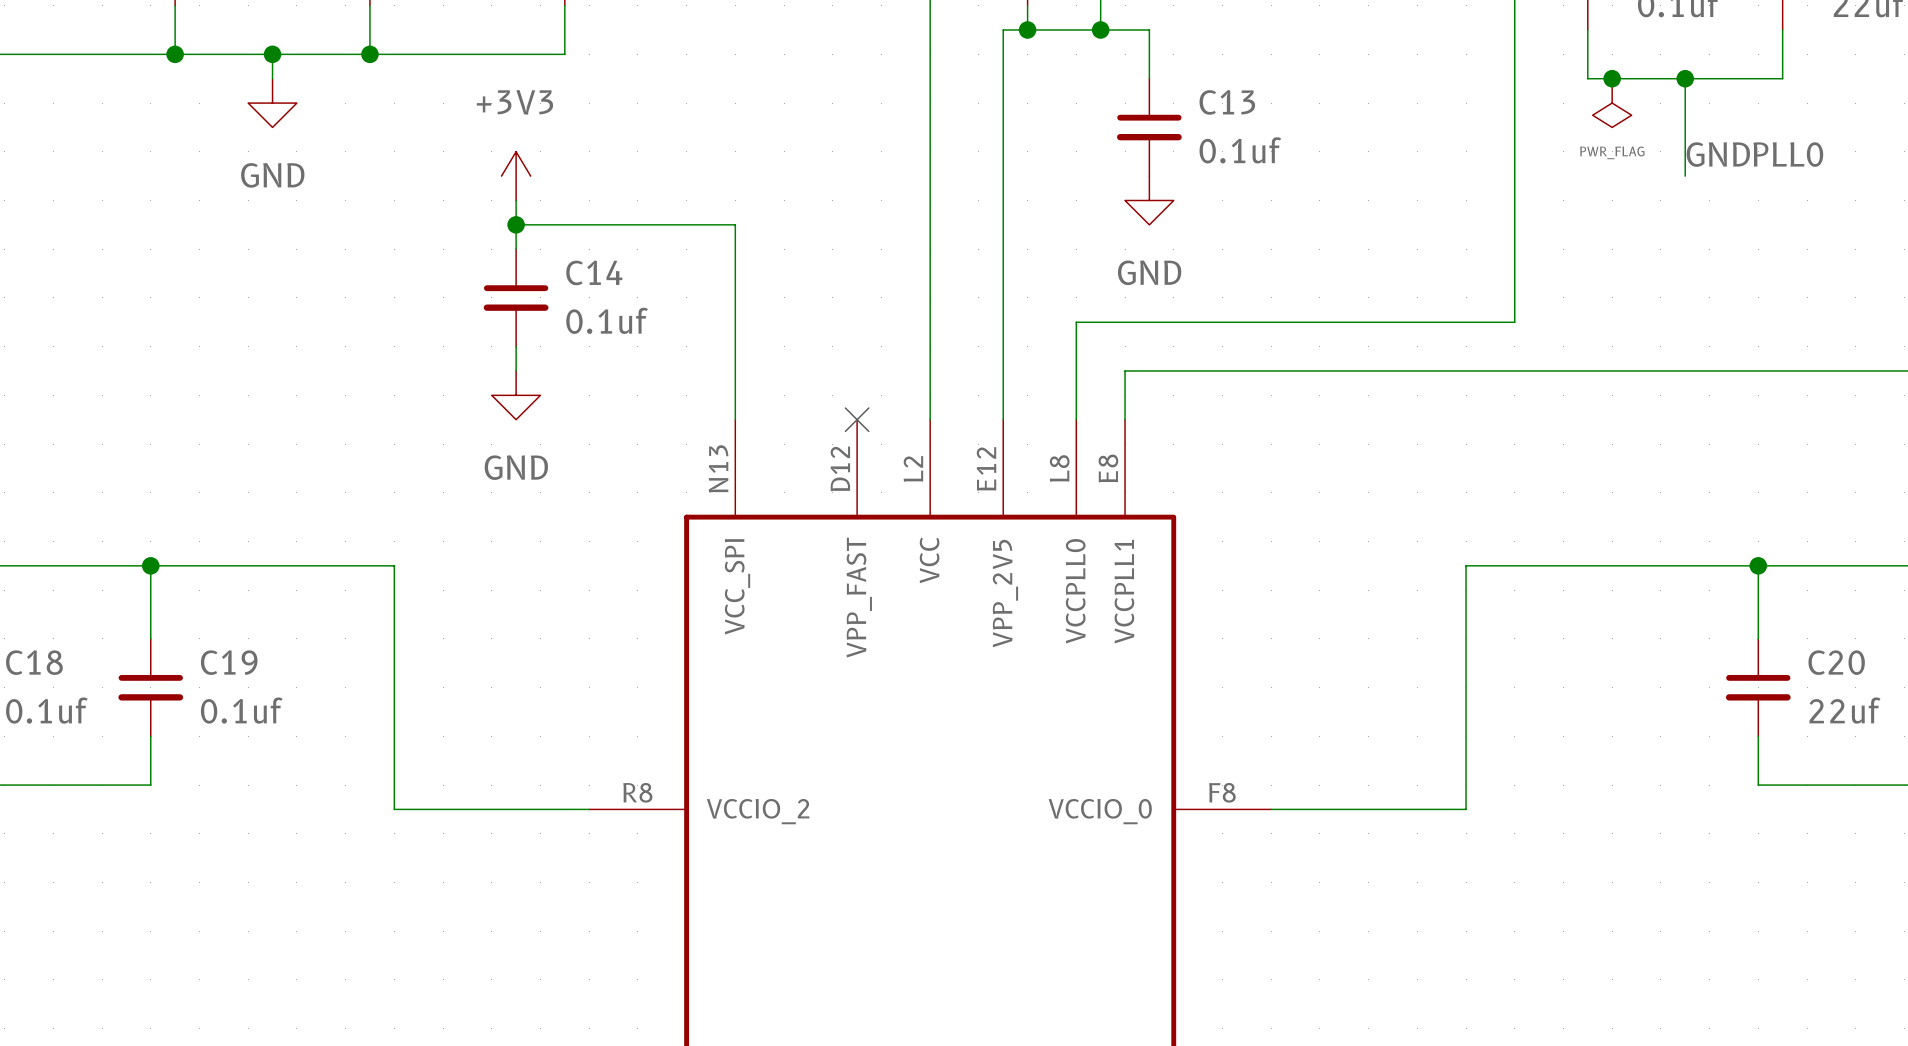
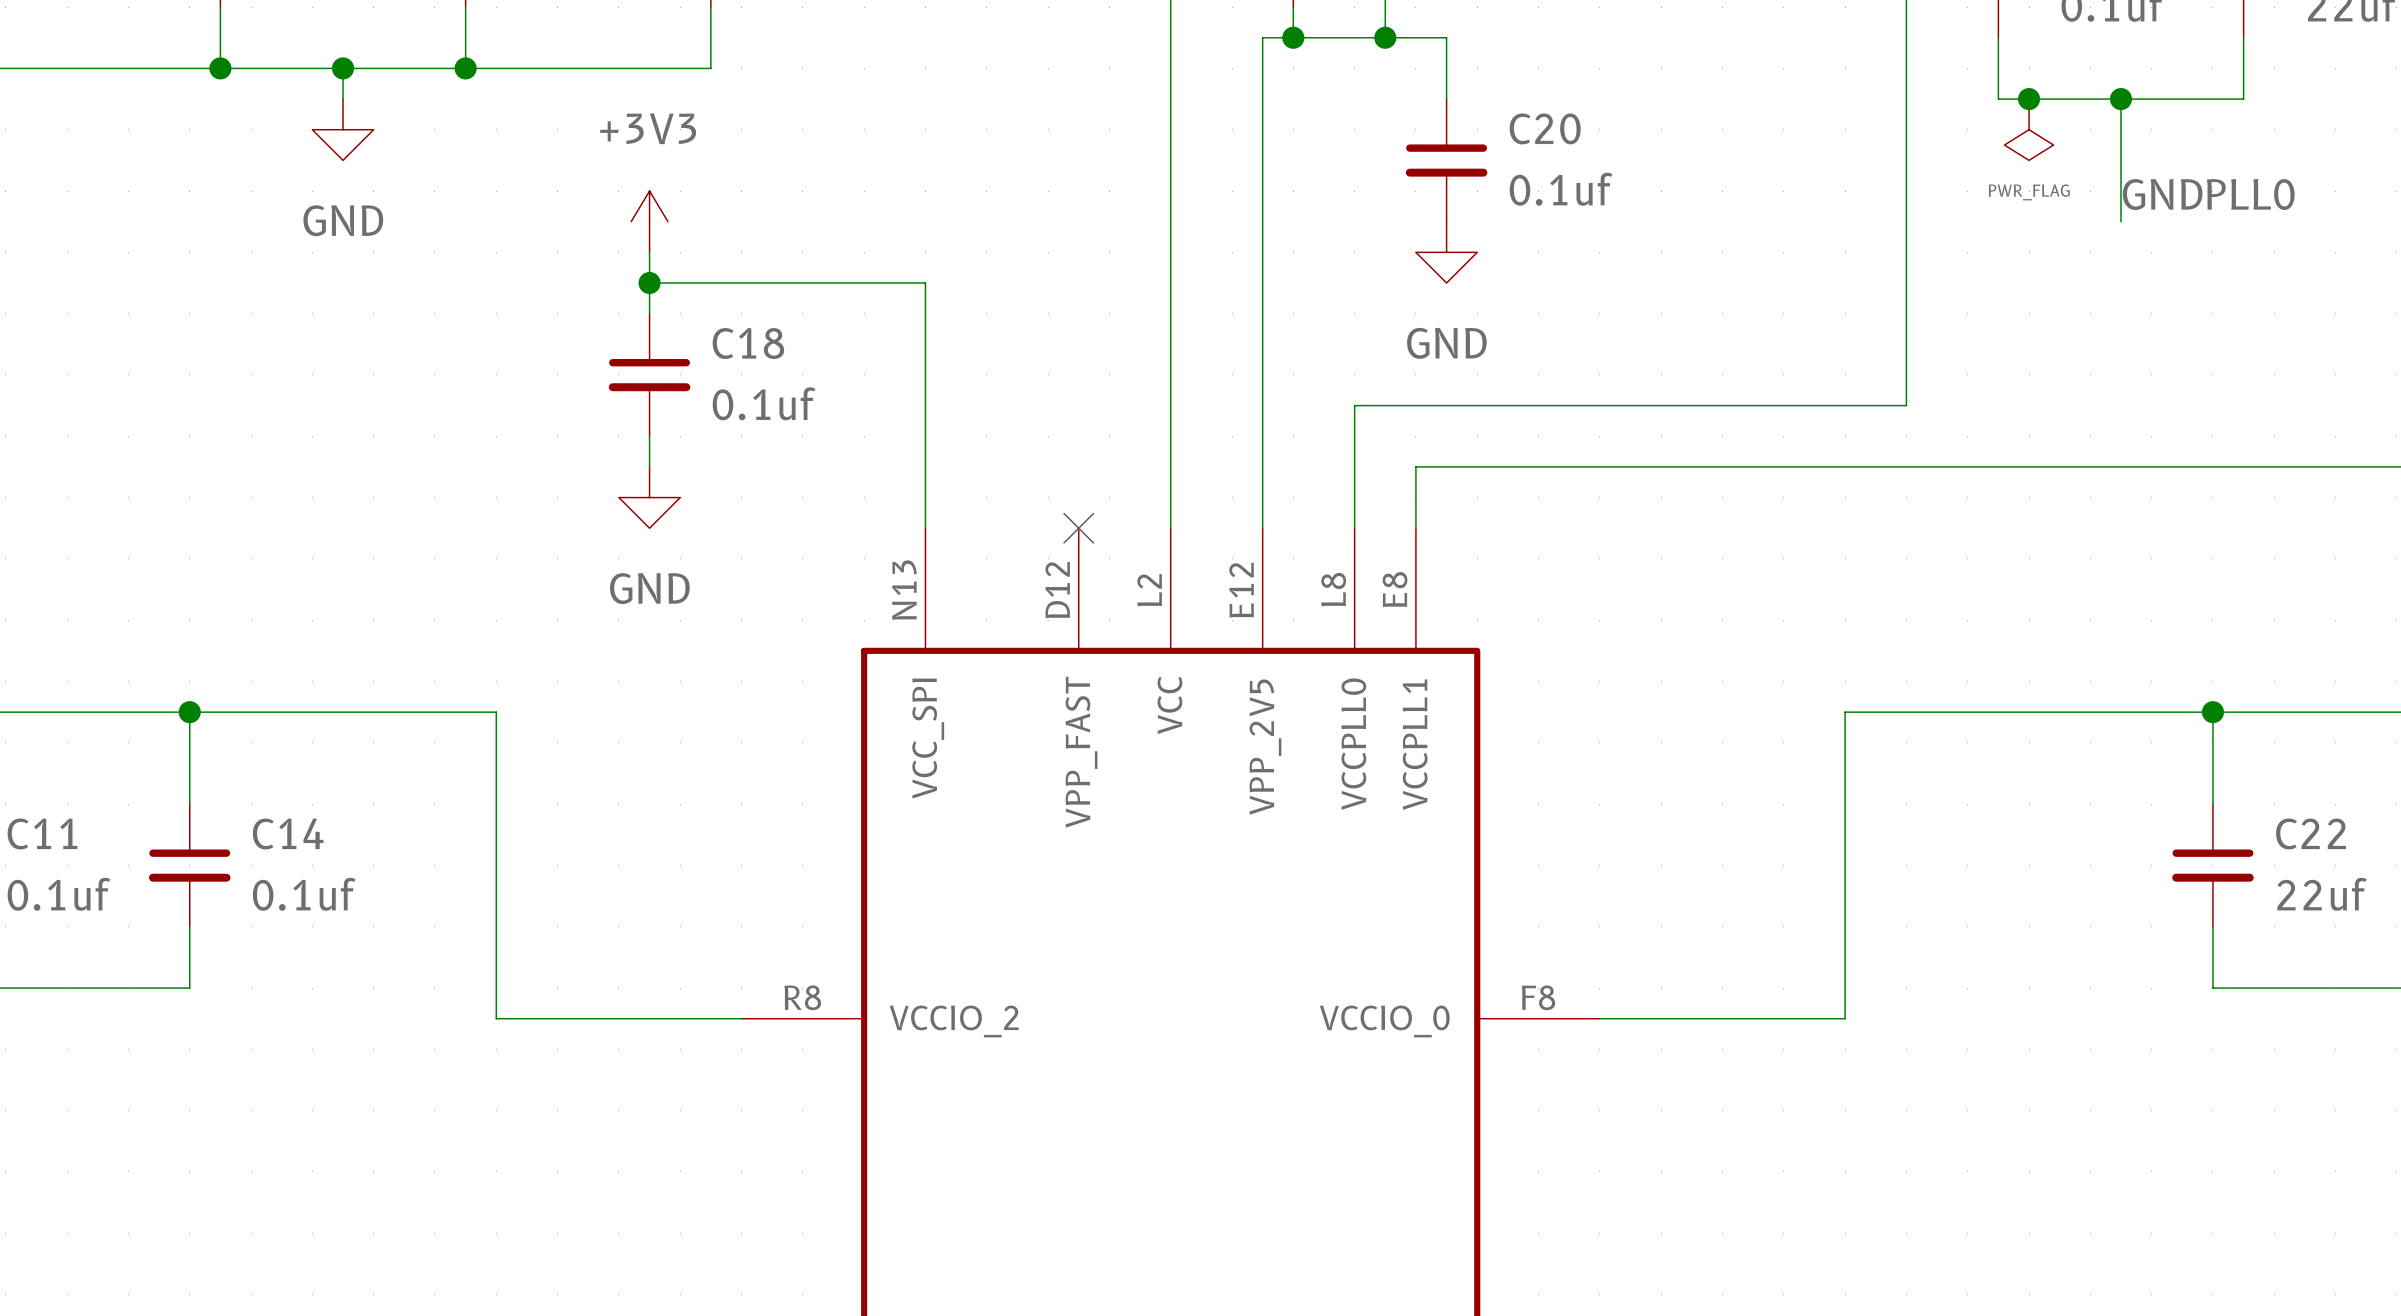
C13 name: C13 (1227, 102) -> C20 (1545, 128)
C14 name: C14 (594, 272) -> C18 (748, 343)
C18 name: C18 (34, 662) -> C11 (42, 833)
C19 name: C19 (229, 662) -> C14 (288, 833)
C20 name: C20 (1836, 662) -> C22 (2311, 833)

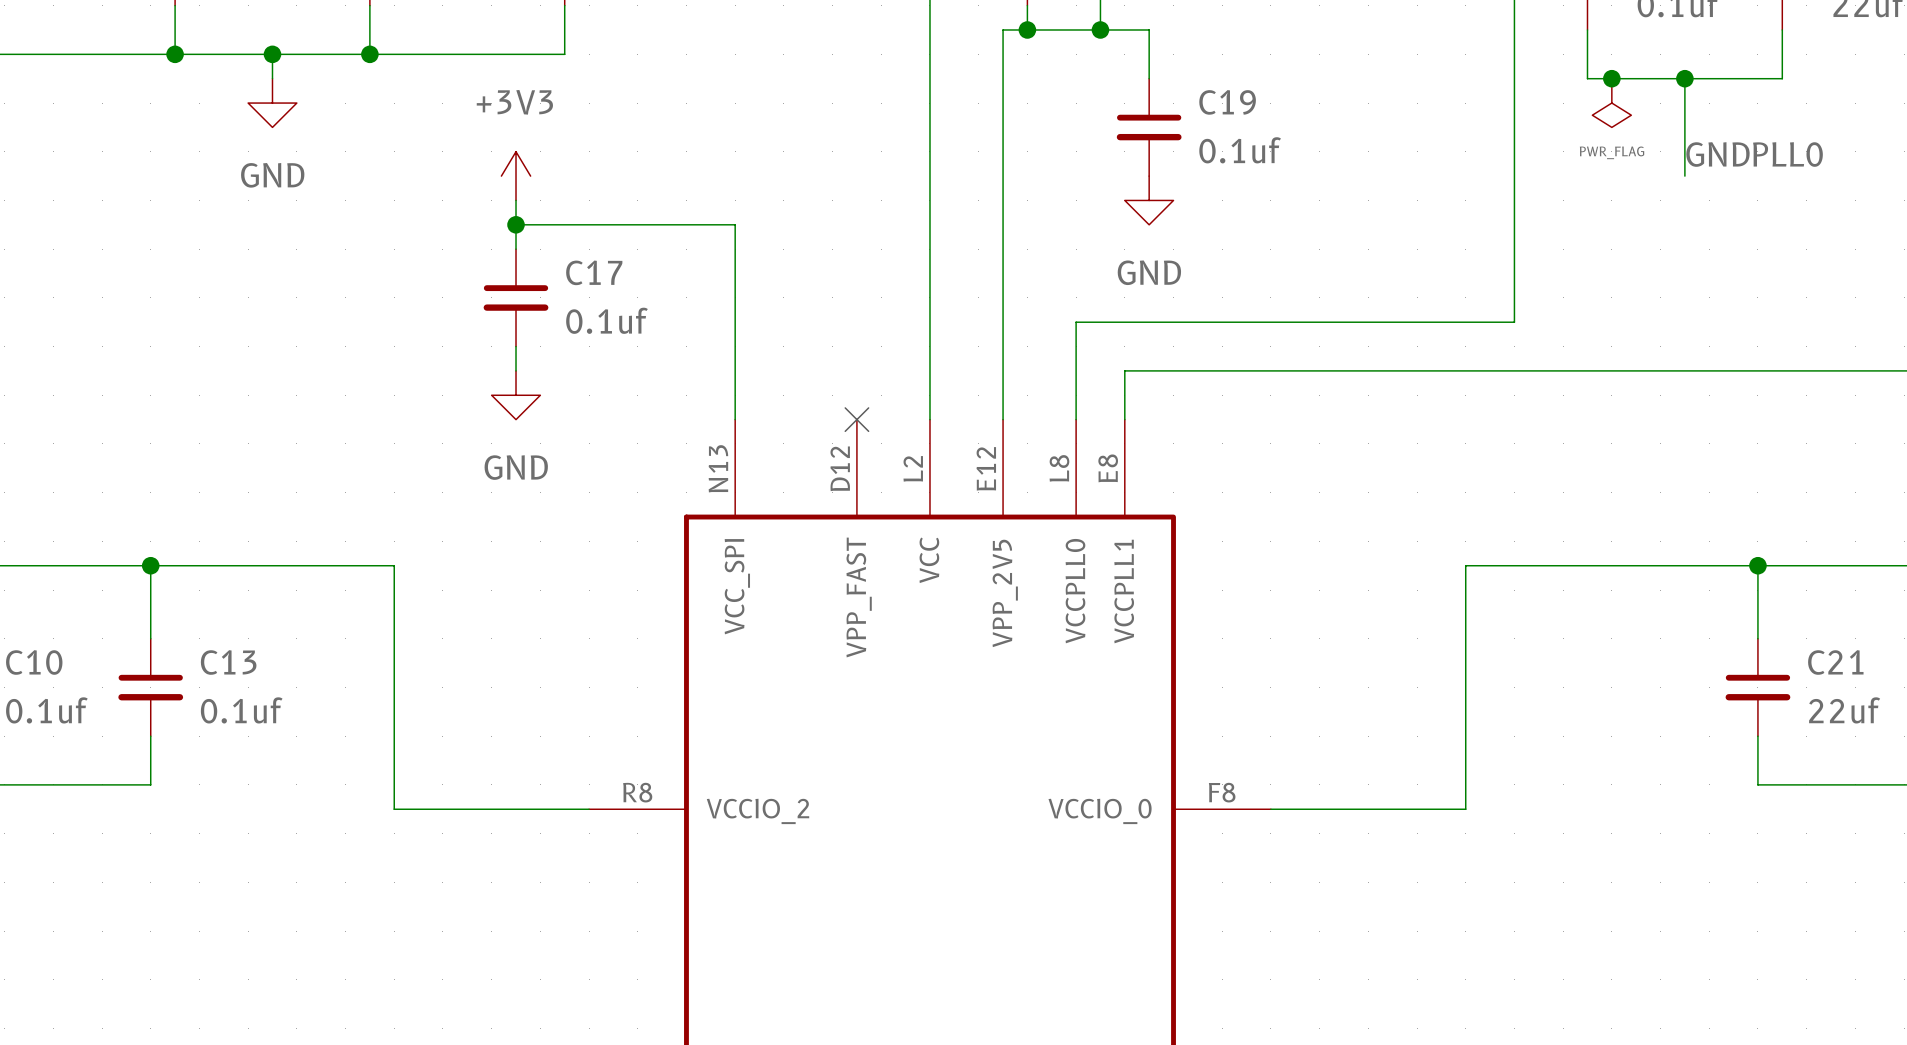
C20 name: C20 (1545, 128) -> C19 (1227, 102)
C18 name: C18 (748, 343) -> C17 (594, 272)
C11 name: C11 (42, 833) -> C10 (34, 662)
C14 name: C14 (288, 833) -> C13 (228, 662)
C22 name: C22 (2311, 833) -> C21 (1835, 662)

